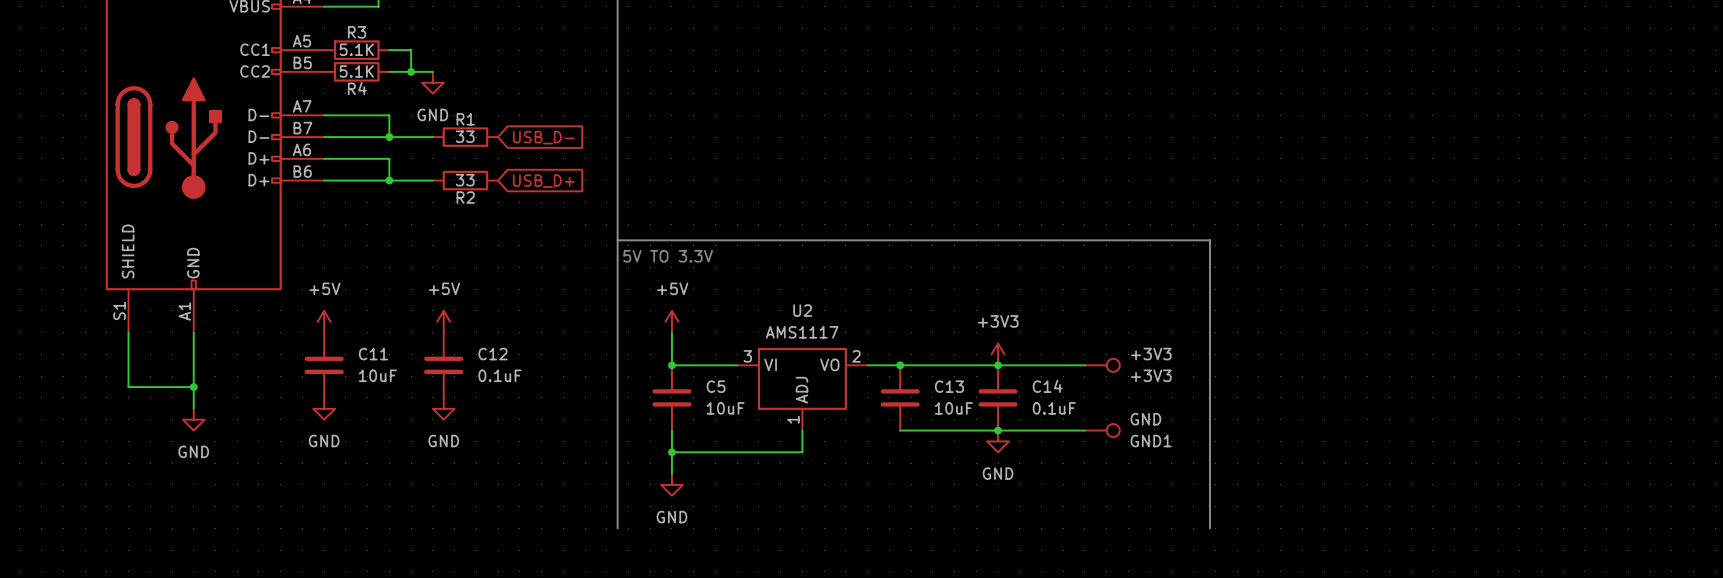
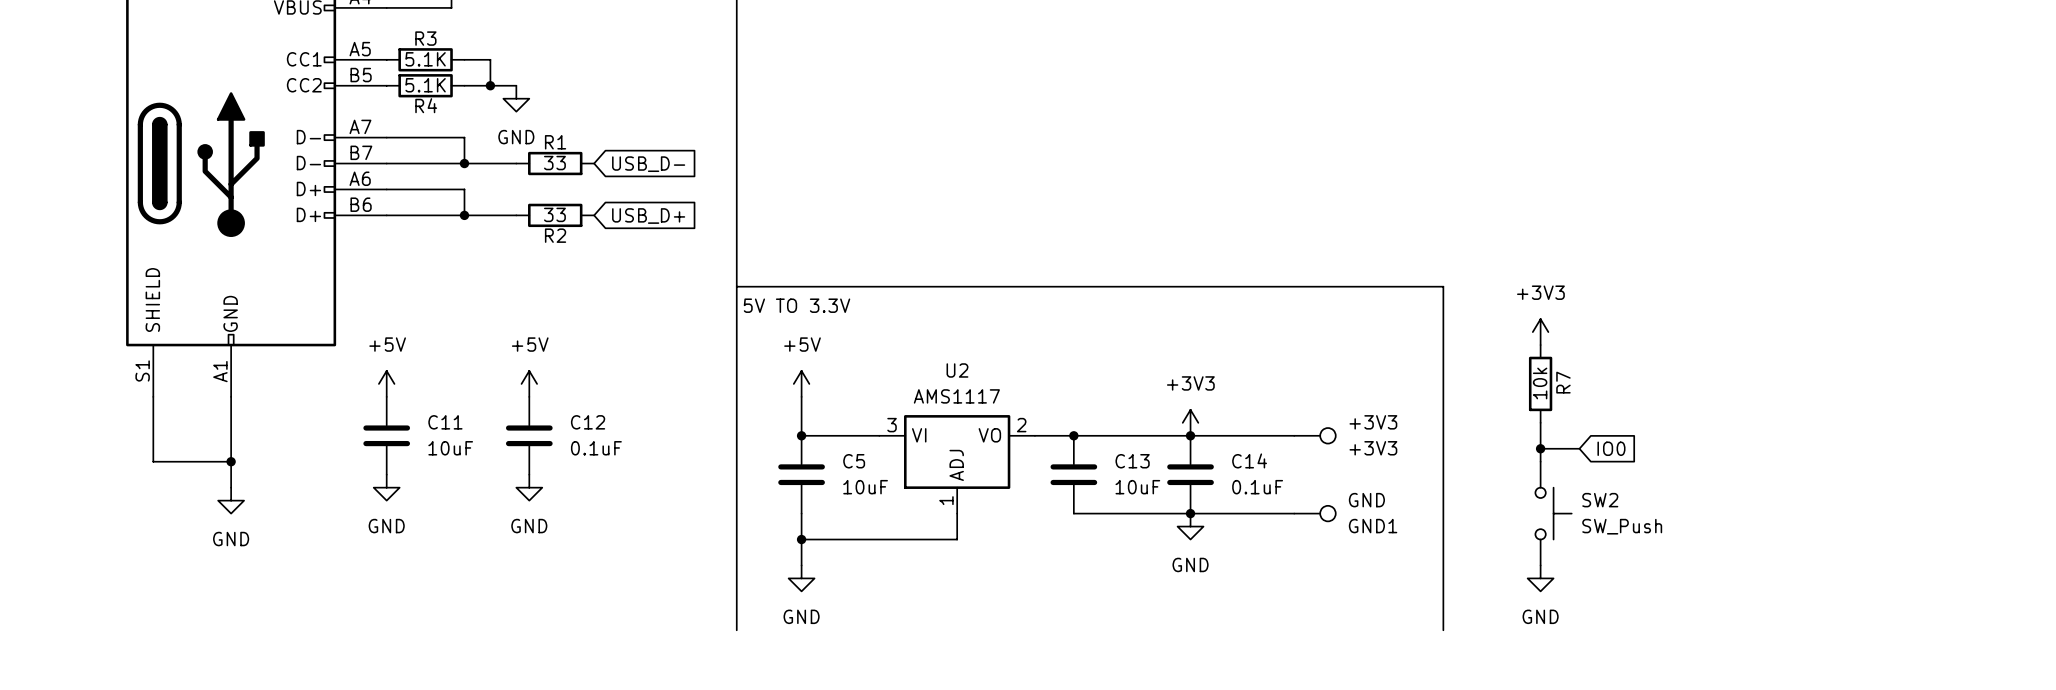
power symbol: none -> +3V3 (1540, 332)
R7: none -> 10k (1540, 383)
wire: none -> (1540, 422) (1540, 461)
wire: none -> (1540, 448) (1579, 448)
junction: none -> (1540, 448)
global label: none -> IO0 (1611, 448)
SW2: none -> SW_Push (1553, 513)
power symbol: none -> GND (1540, 578)

